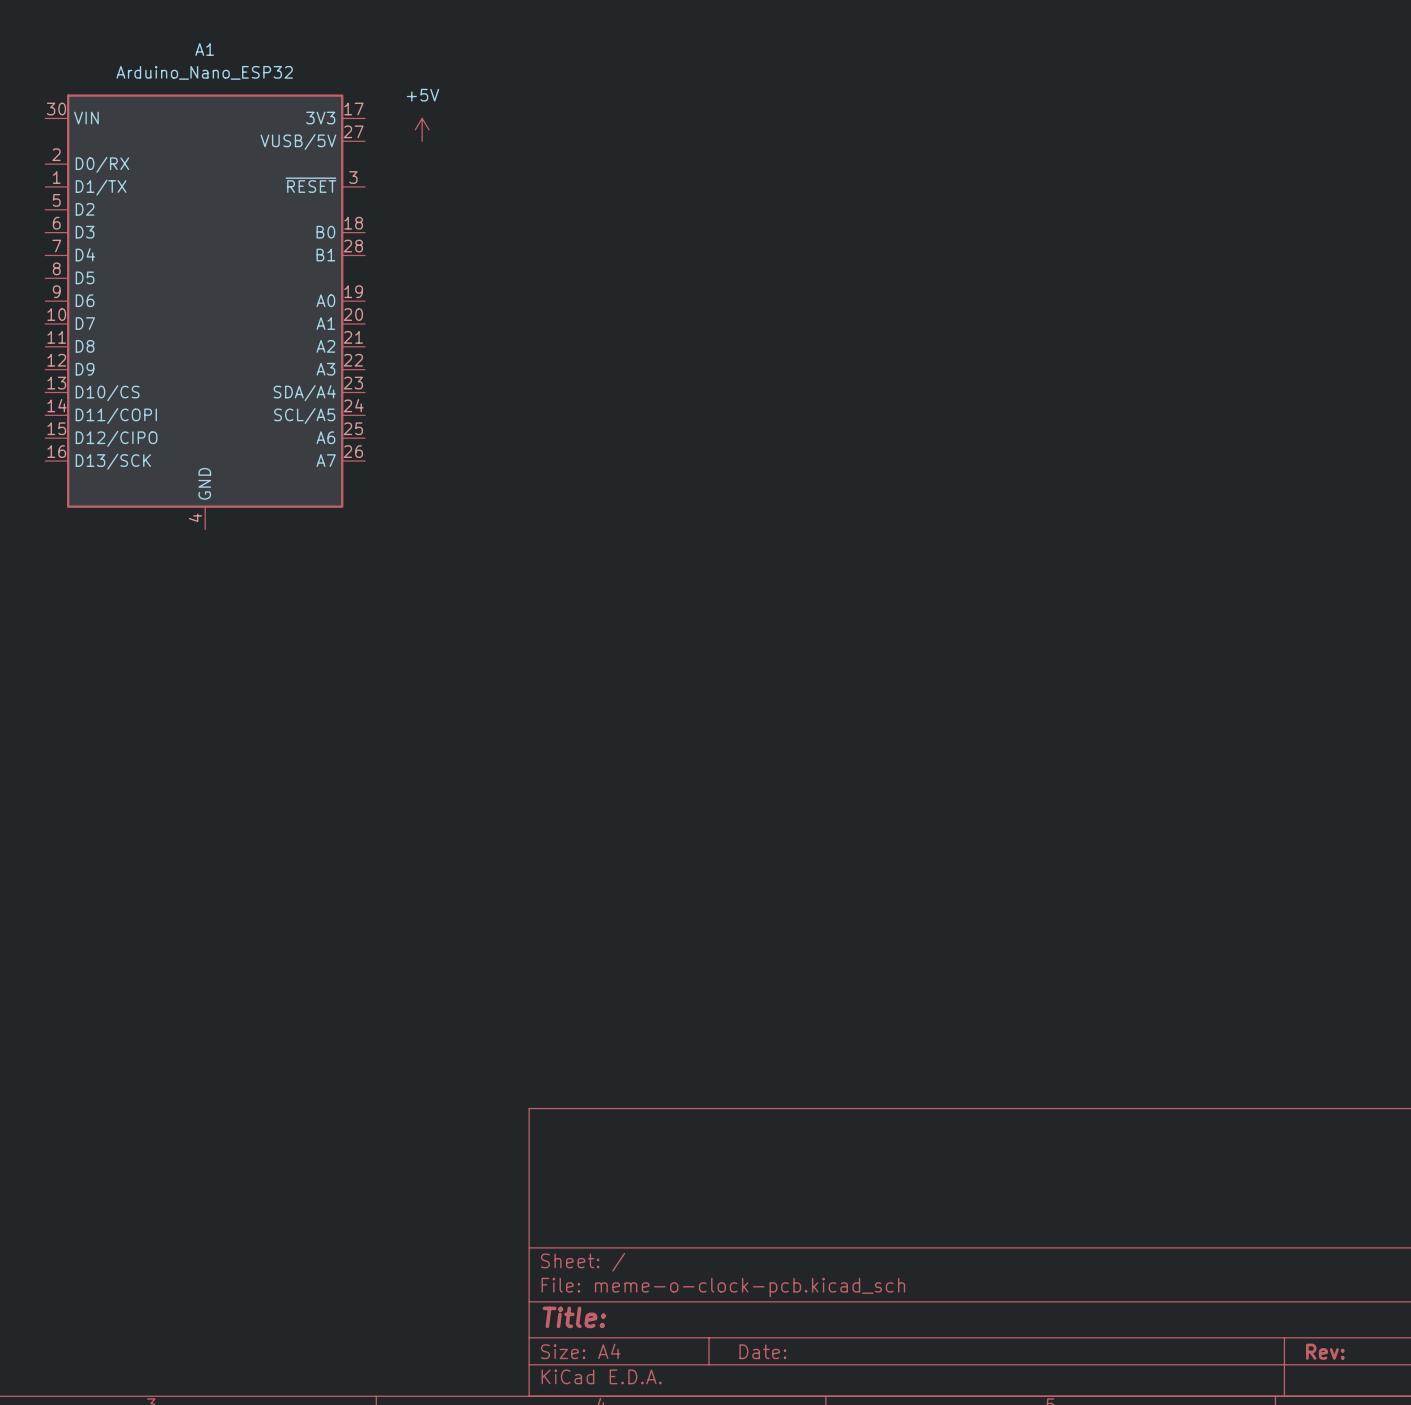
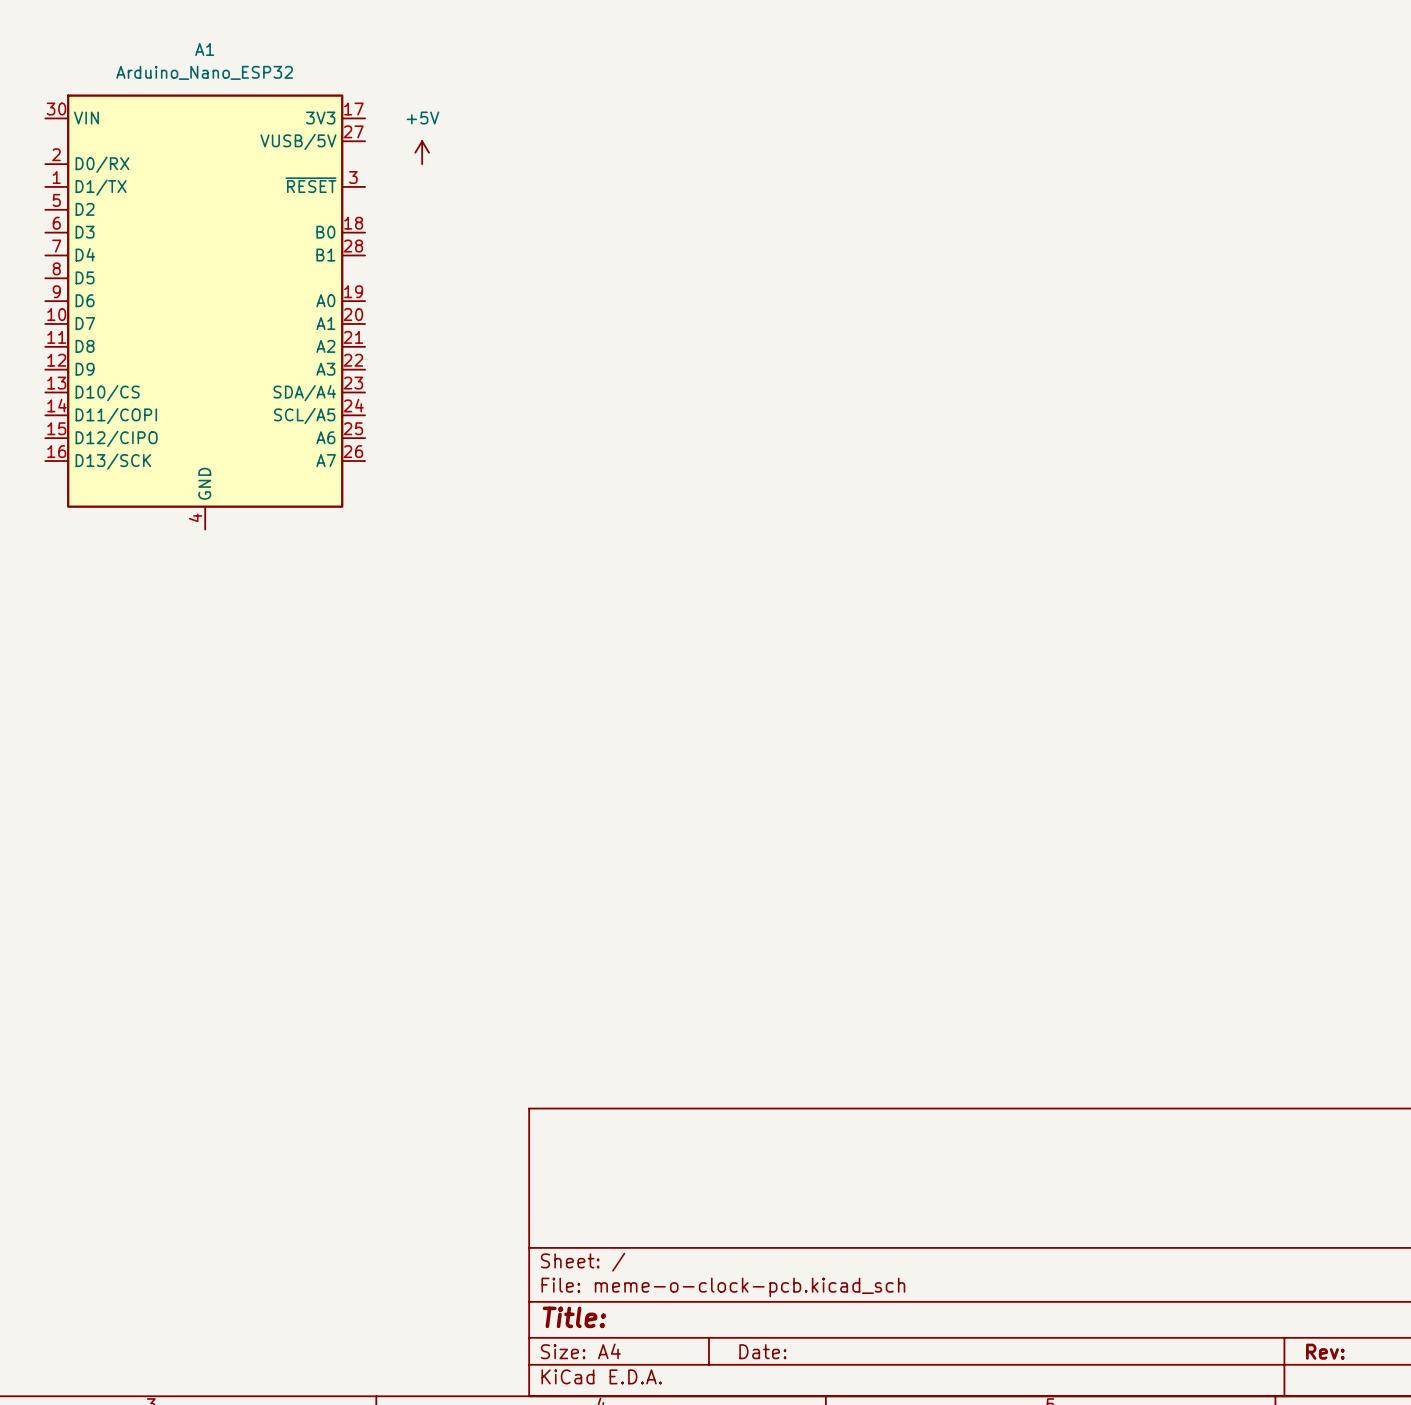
power symbol position: +5V (422, 129) -> +5V (422, 152)

